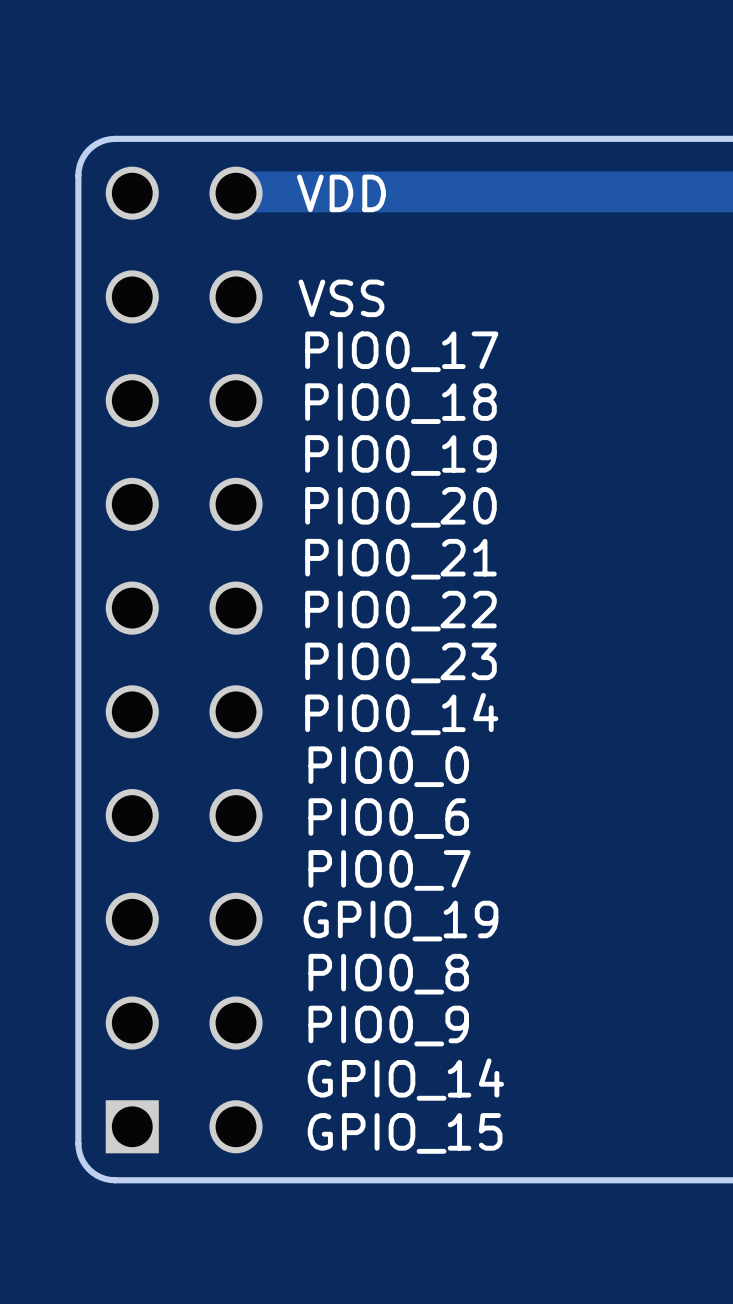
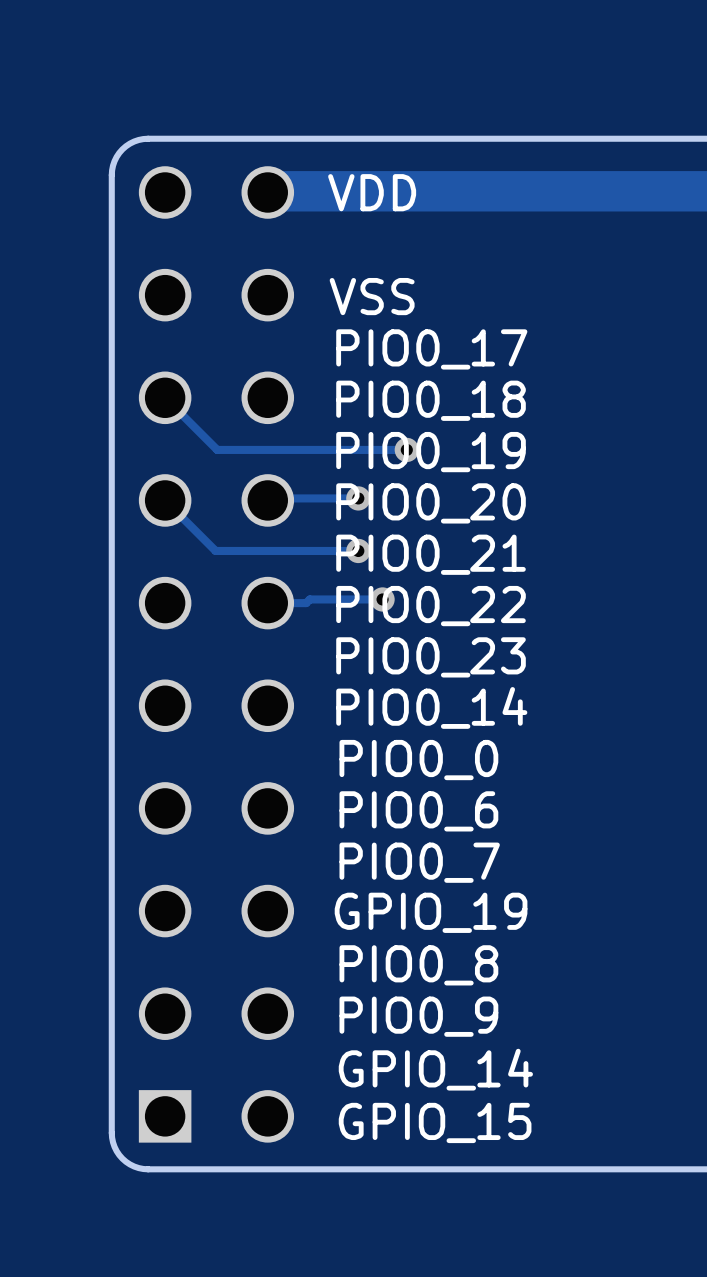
track: none -> (165, 397) (217, 449) (406, 449)
via: none -> (406, 449)
track: none -> (358, 498) (269, 498) (267, 500)
via: none -> (358, 498)
track: none -> (165, 500) (215, 550) (358, 550)
via: none -> (358, 550)
track: none -> (382, 599) (309, 599) (306, 603) (267, 603)
via: none -> (382, 599)

